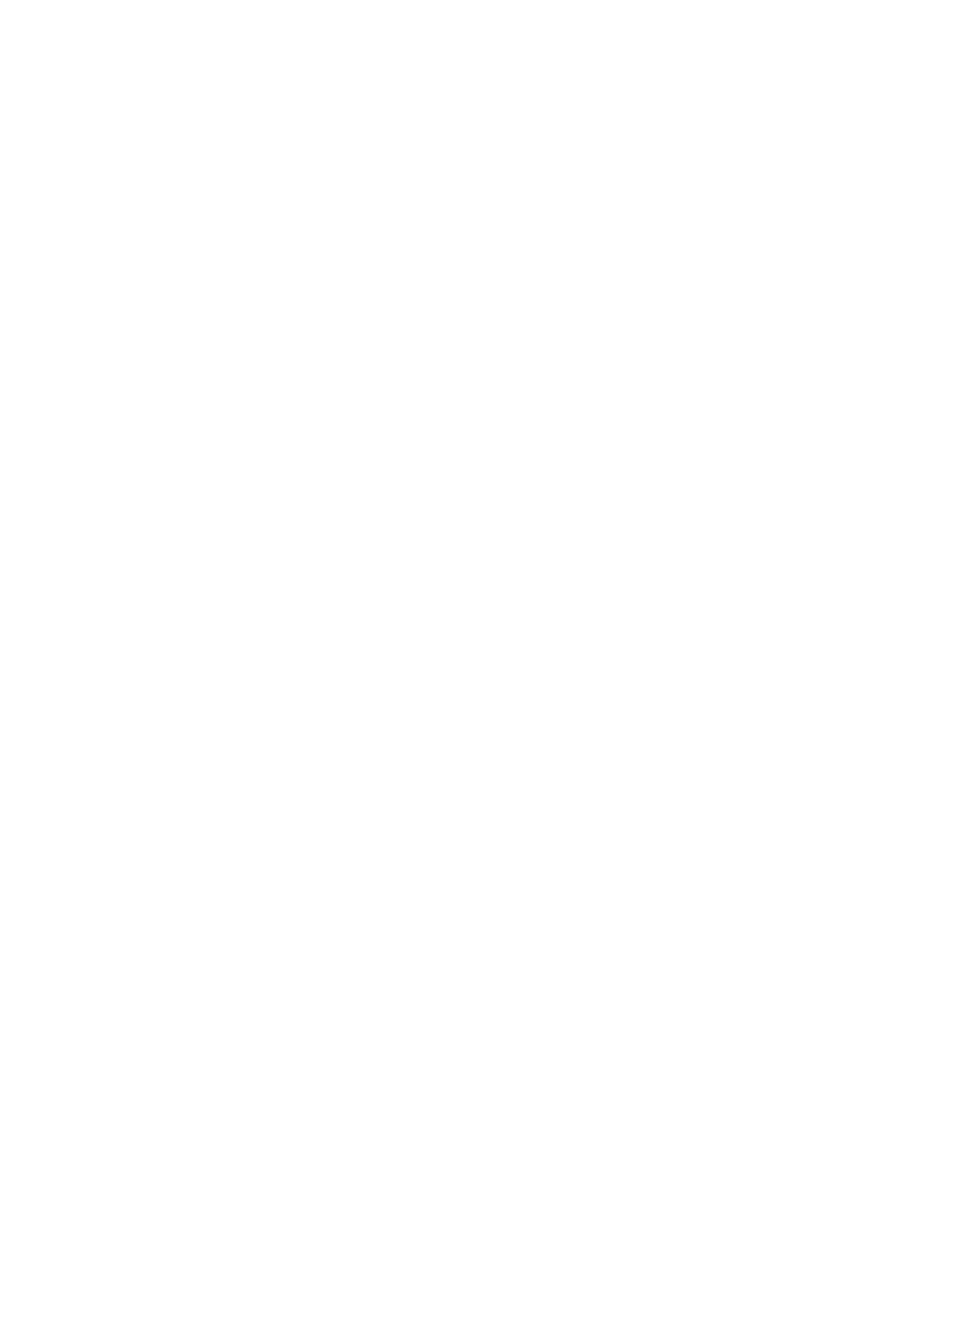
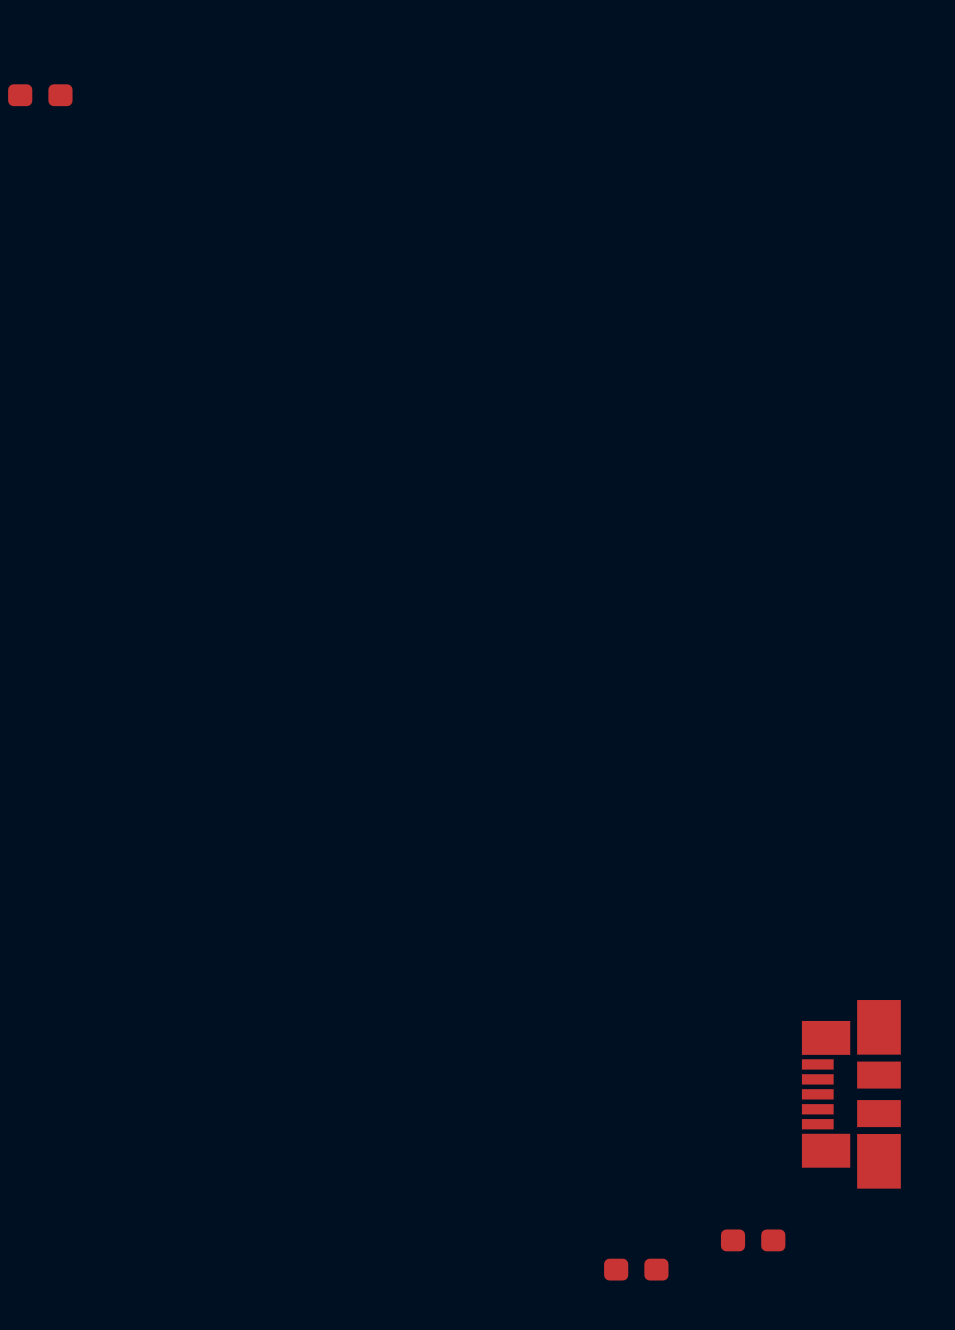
part: none -> (40, 95)
part: none -> (851, 1094)
part: none -> (753, 1240)
part: none -> (636, 1269)

